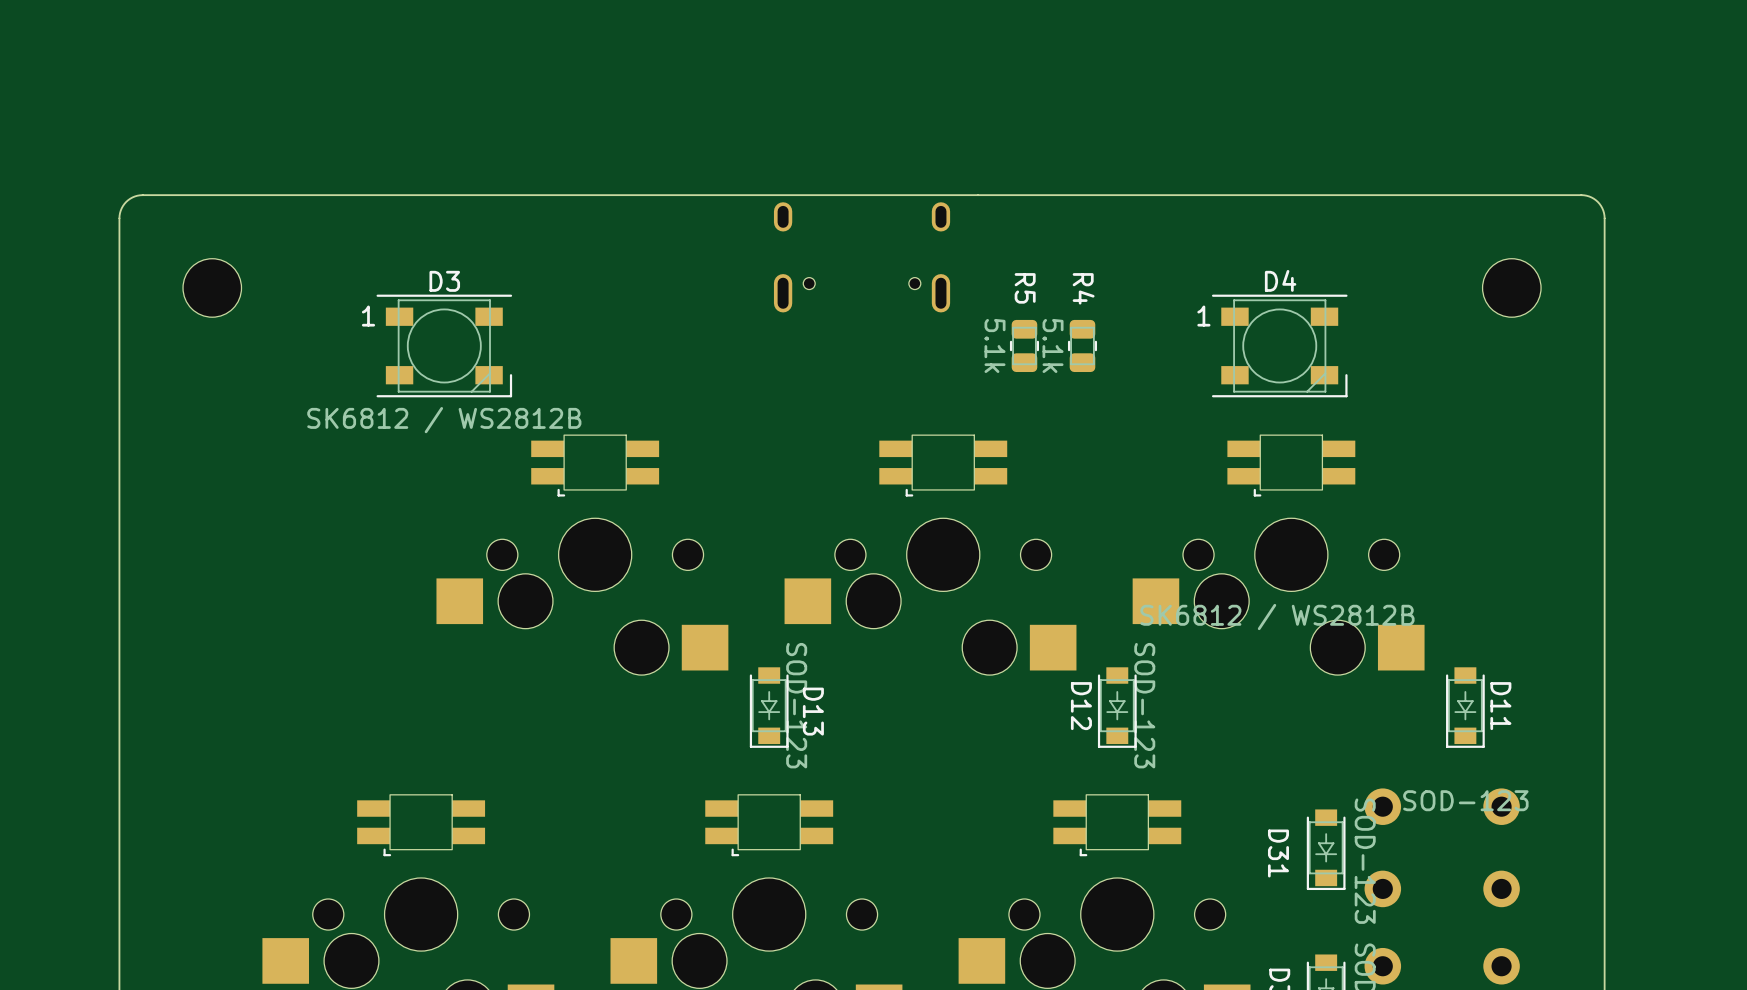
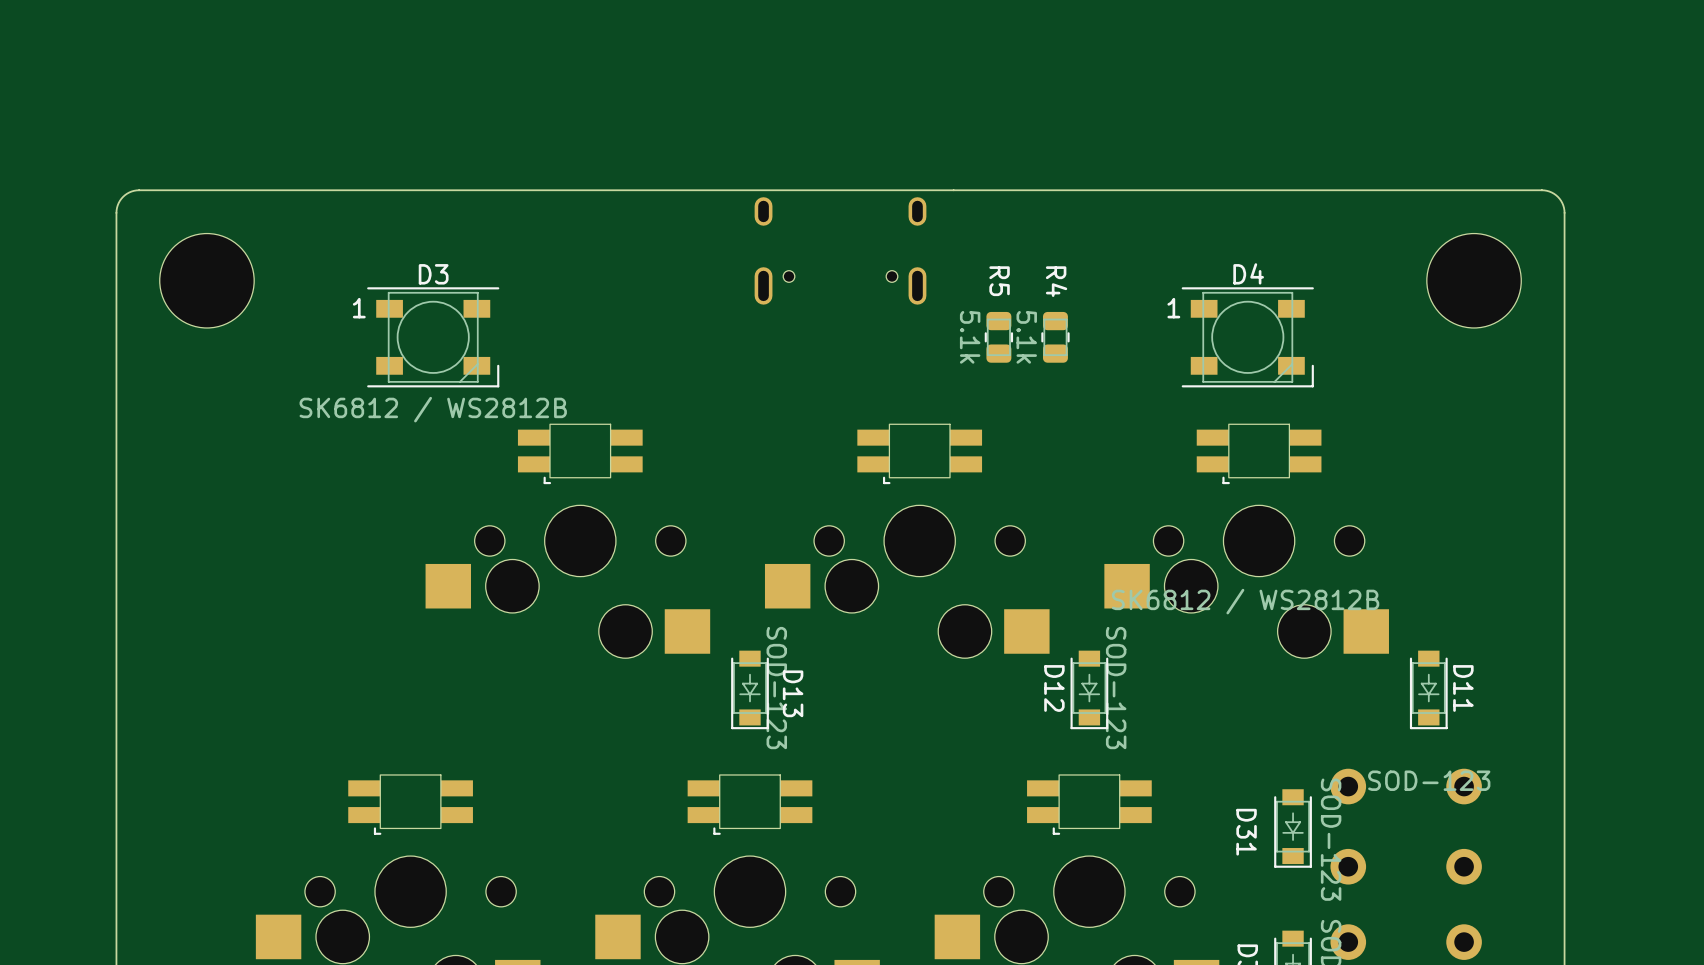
part footprint: [183, 258, 242, 318] -> [159, 233, 255, 328]
part footprint: [1482, 258, 1542, 318] -> [1426, 233, 1522, 328]

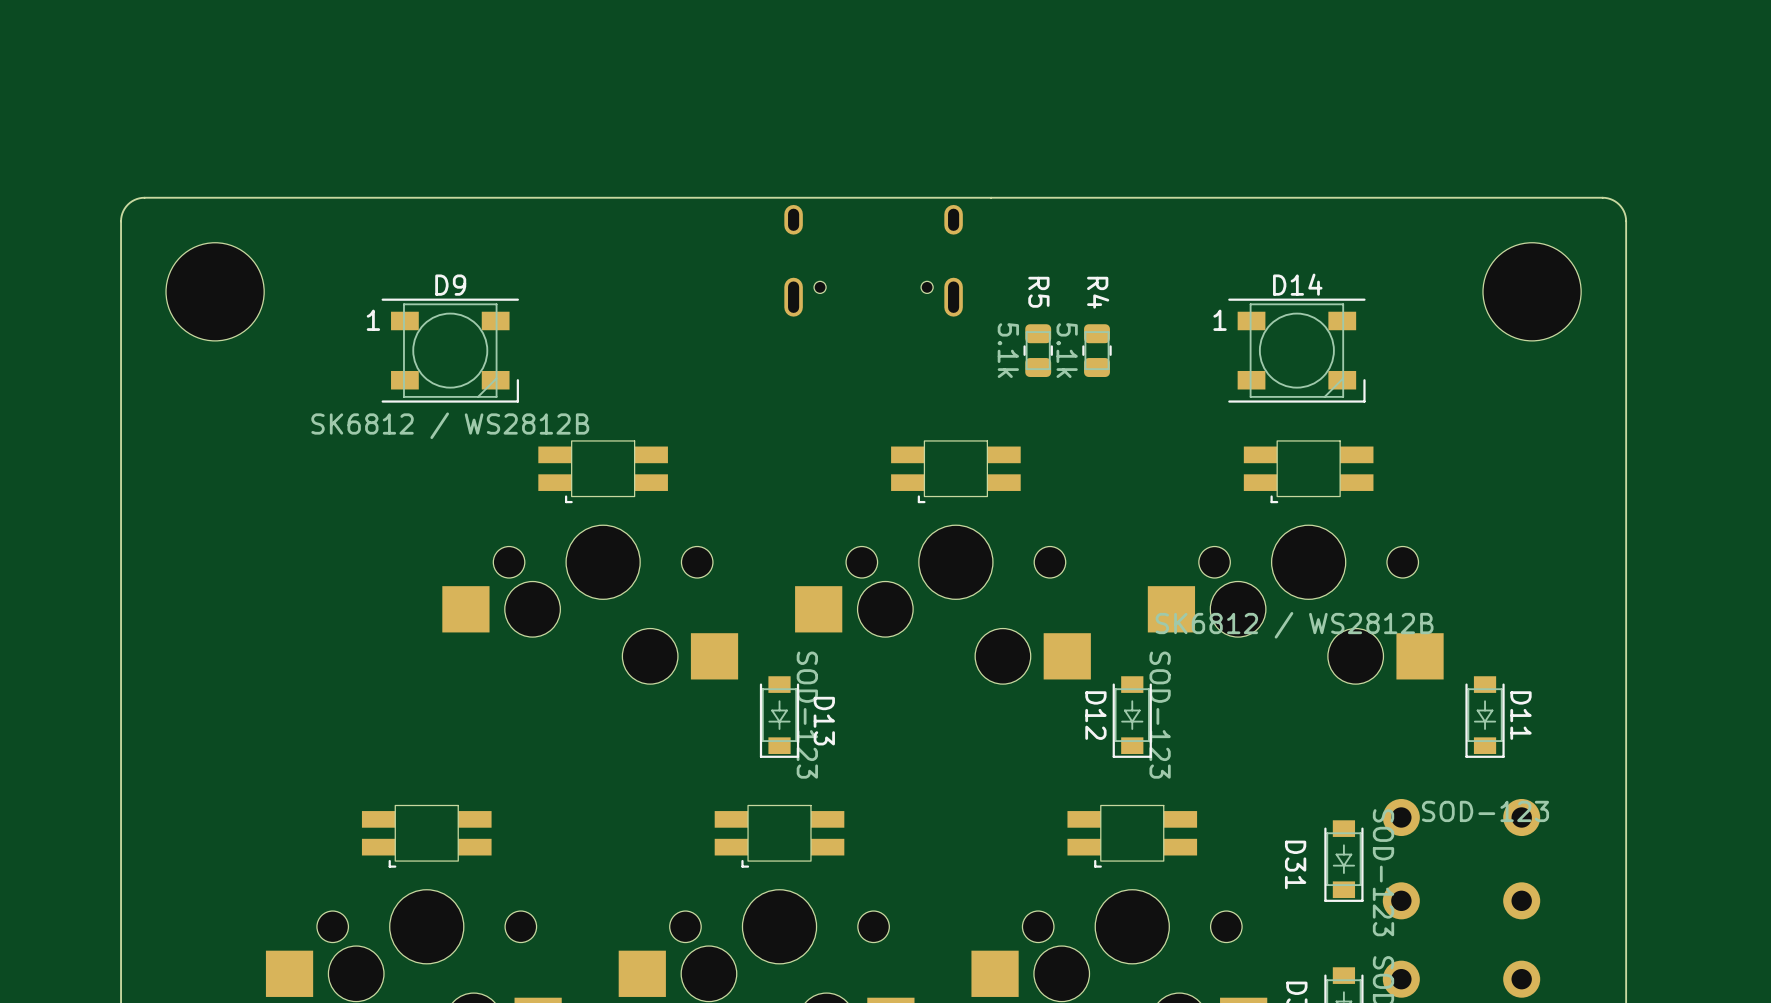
D4 name: D4 (1248, 273) -> D14 (1297, 284)
D3 name: D3 (433, 274) -> D9 (450, 285)

